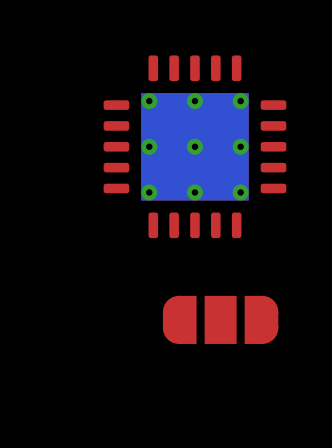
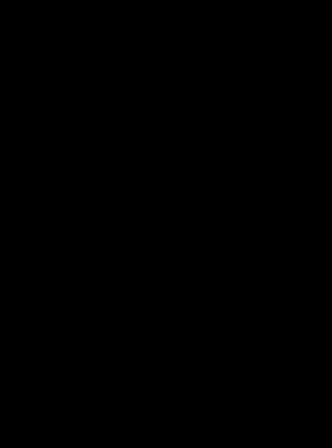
part: (194, 146) -> none
part: (220, 319) -> none

